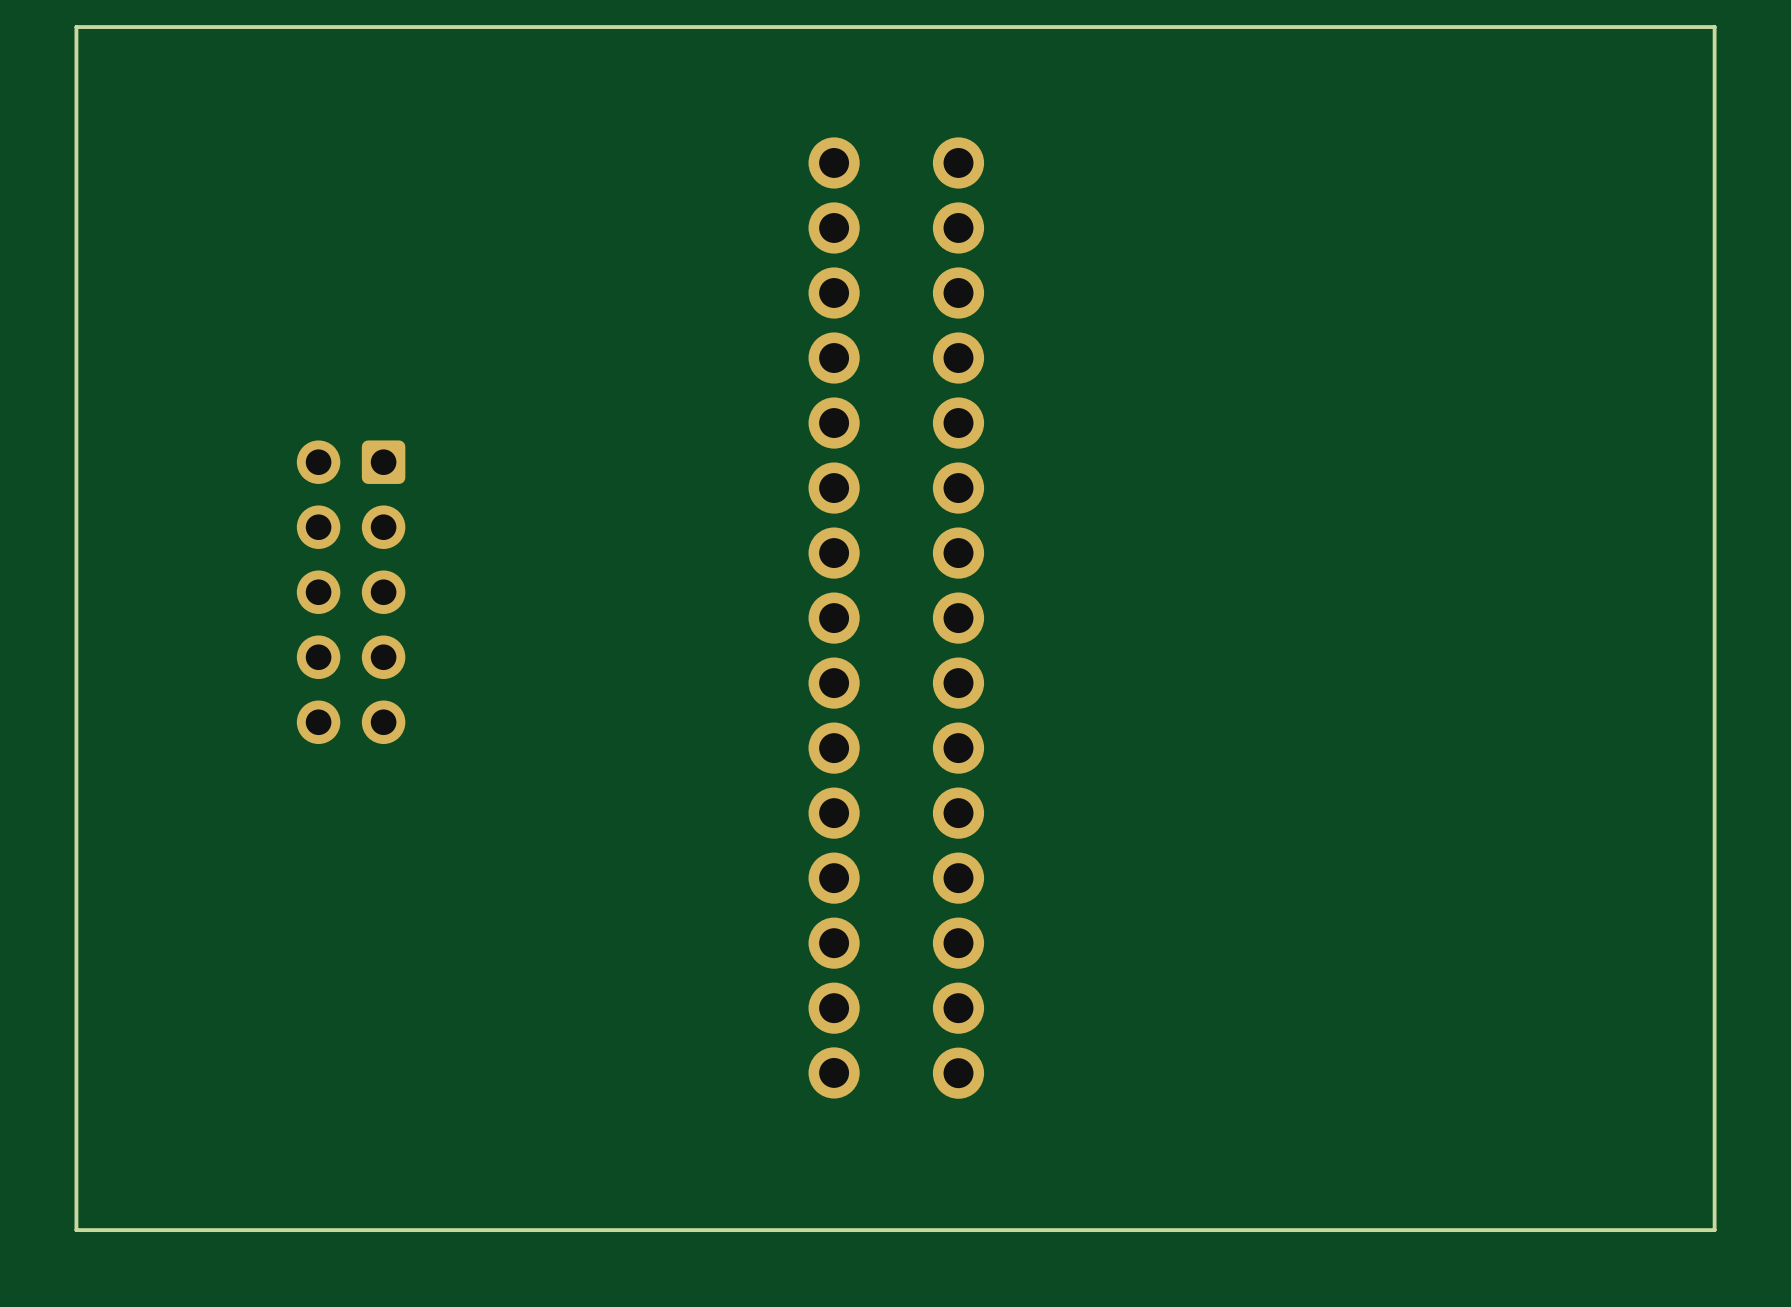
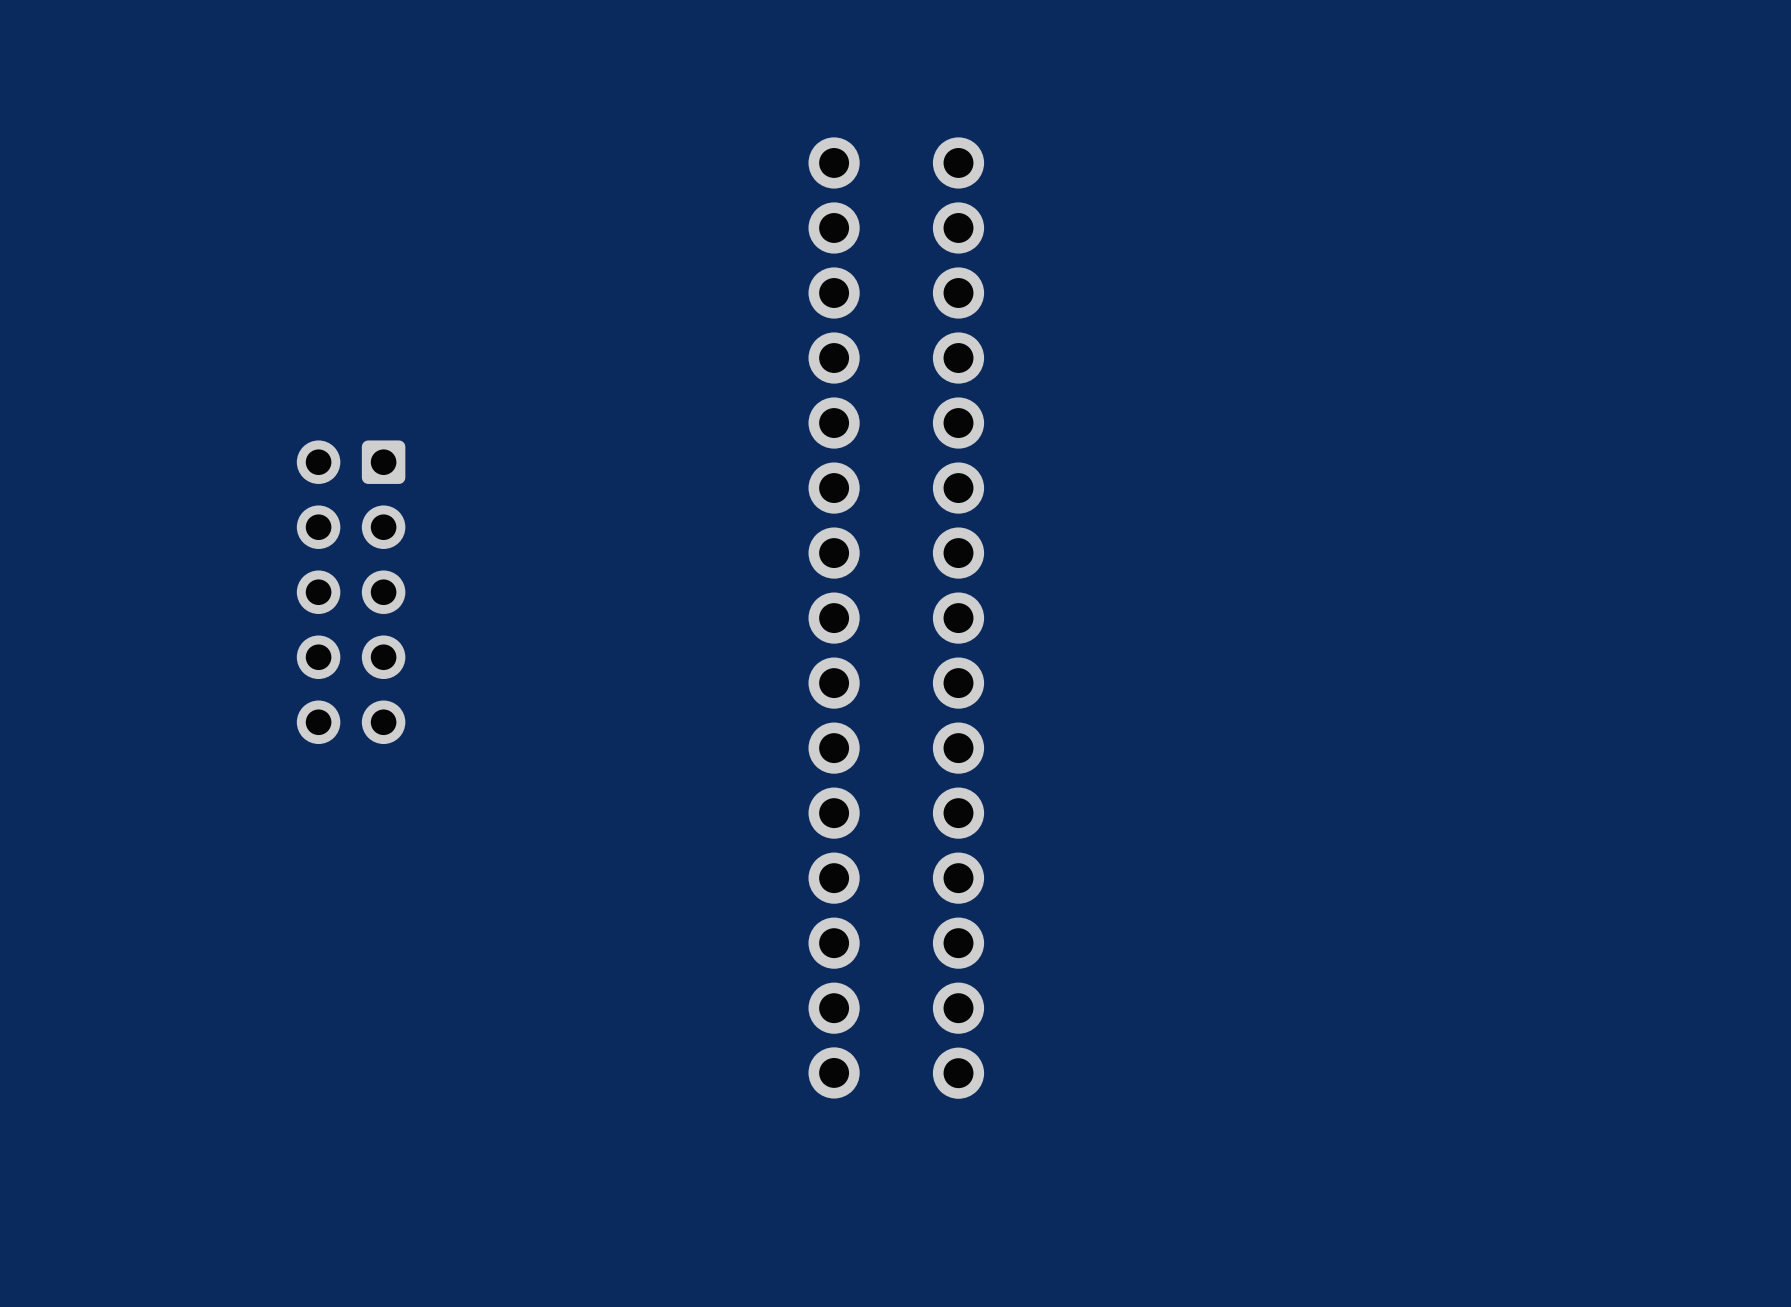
board edge: (1714, 27) (1714, 1230) (76, 1230) (76, 27) (1714, 27) -> none

